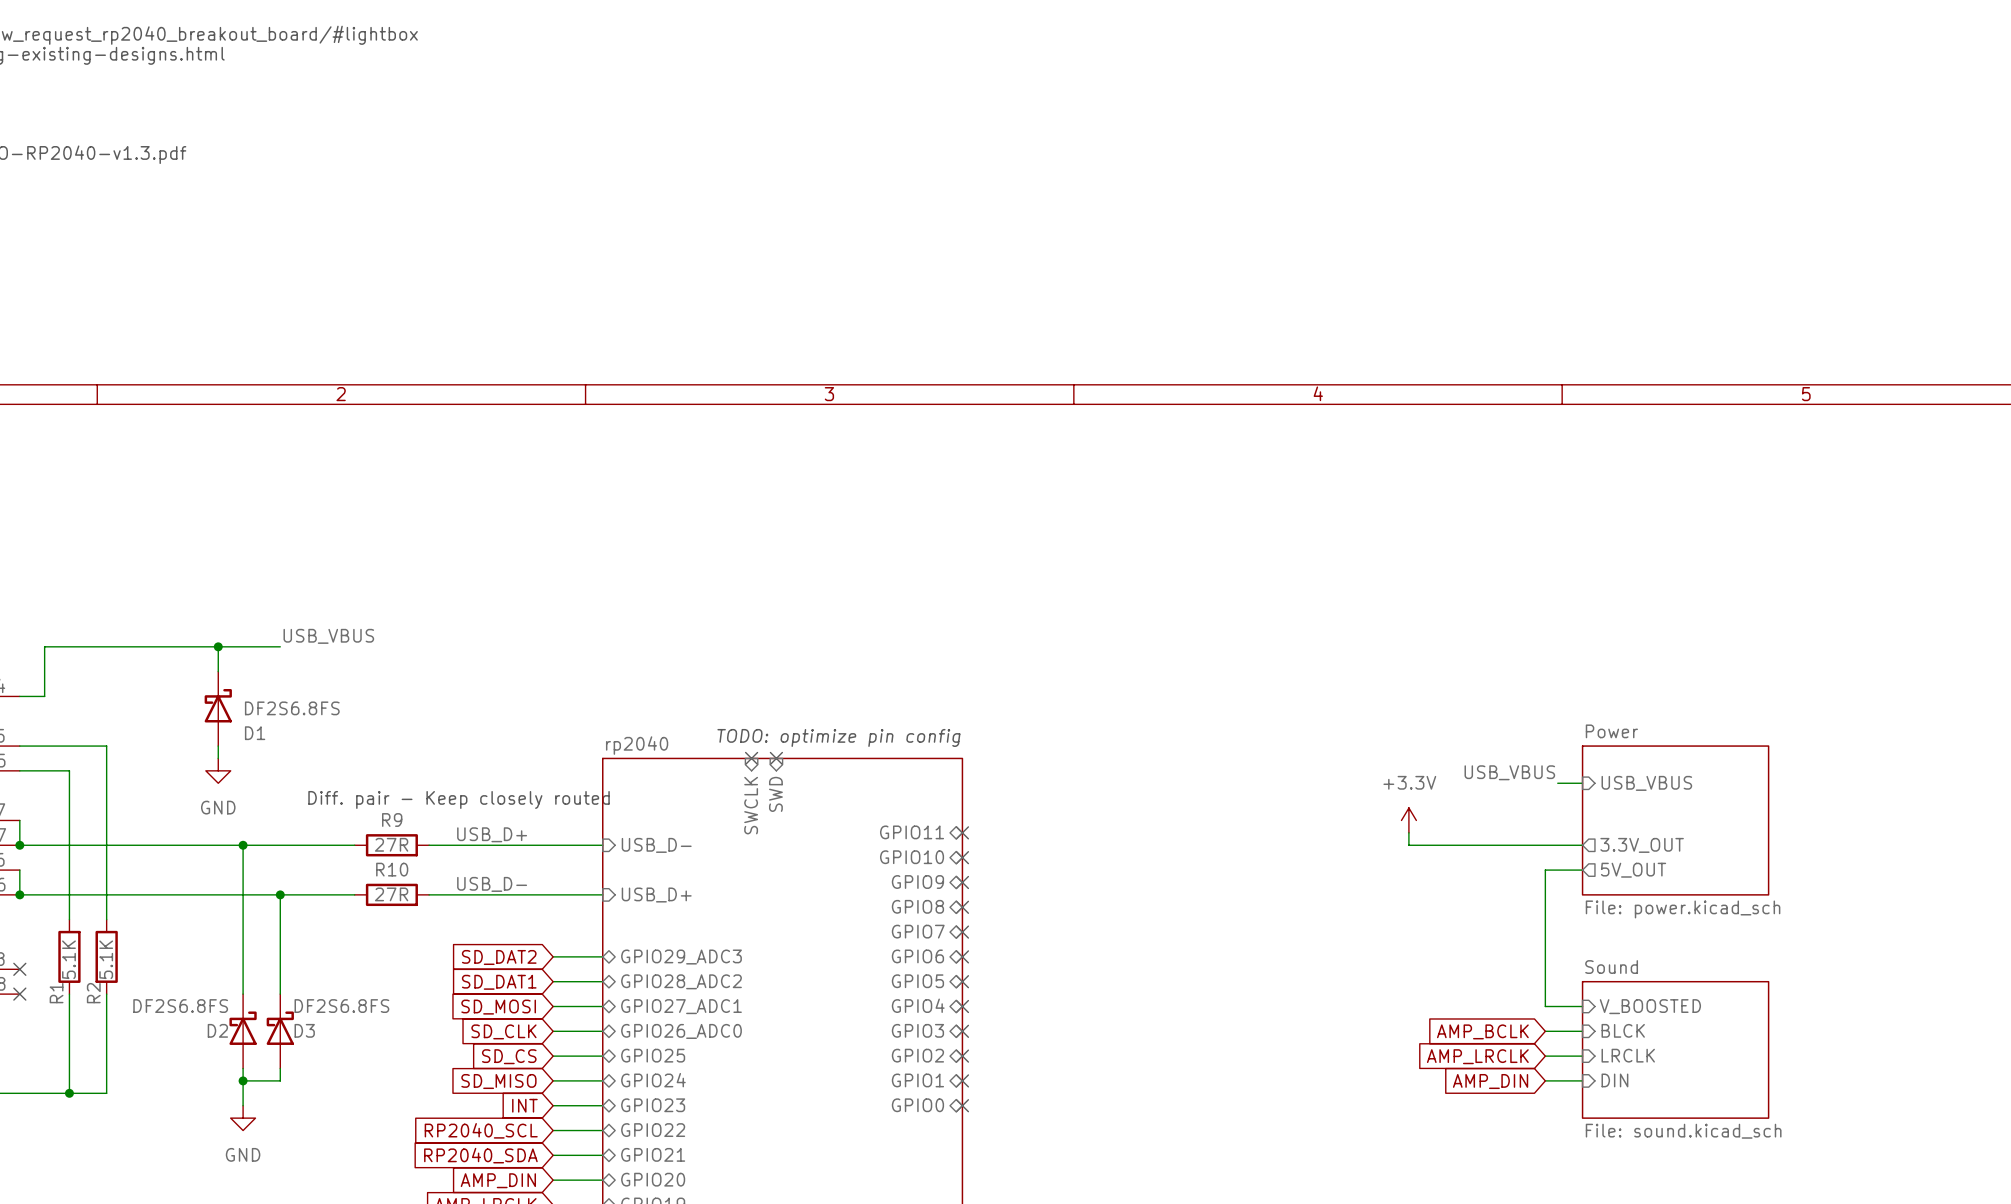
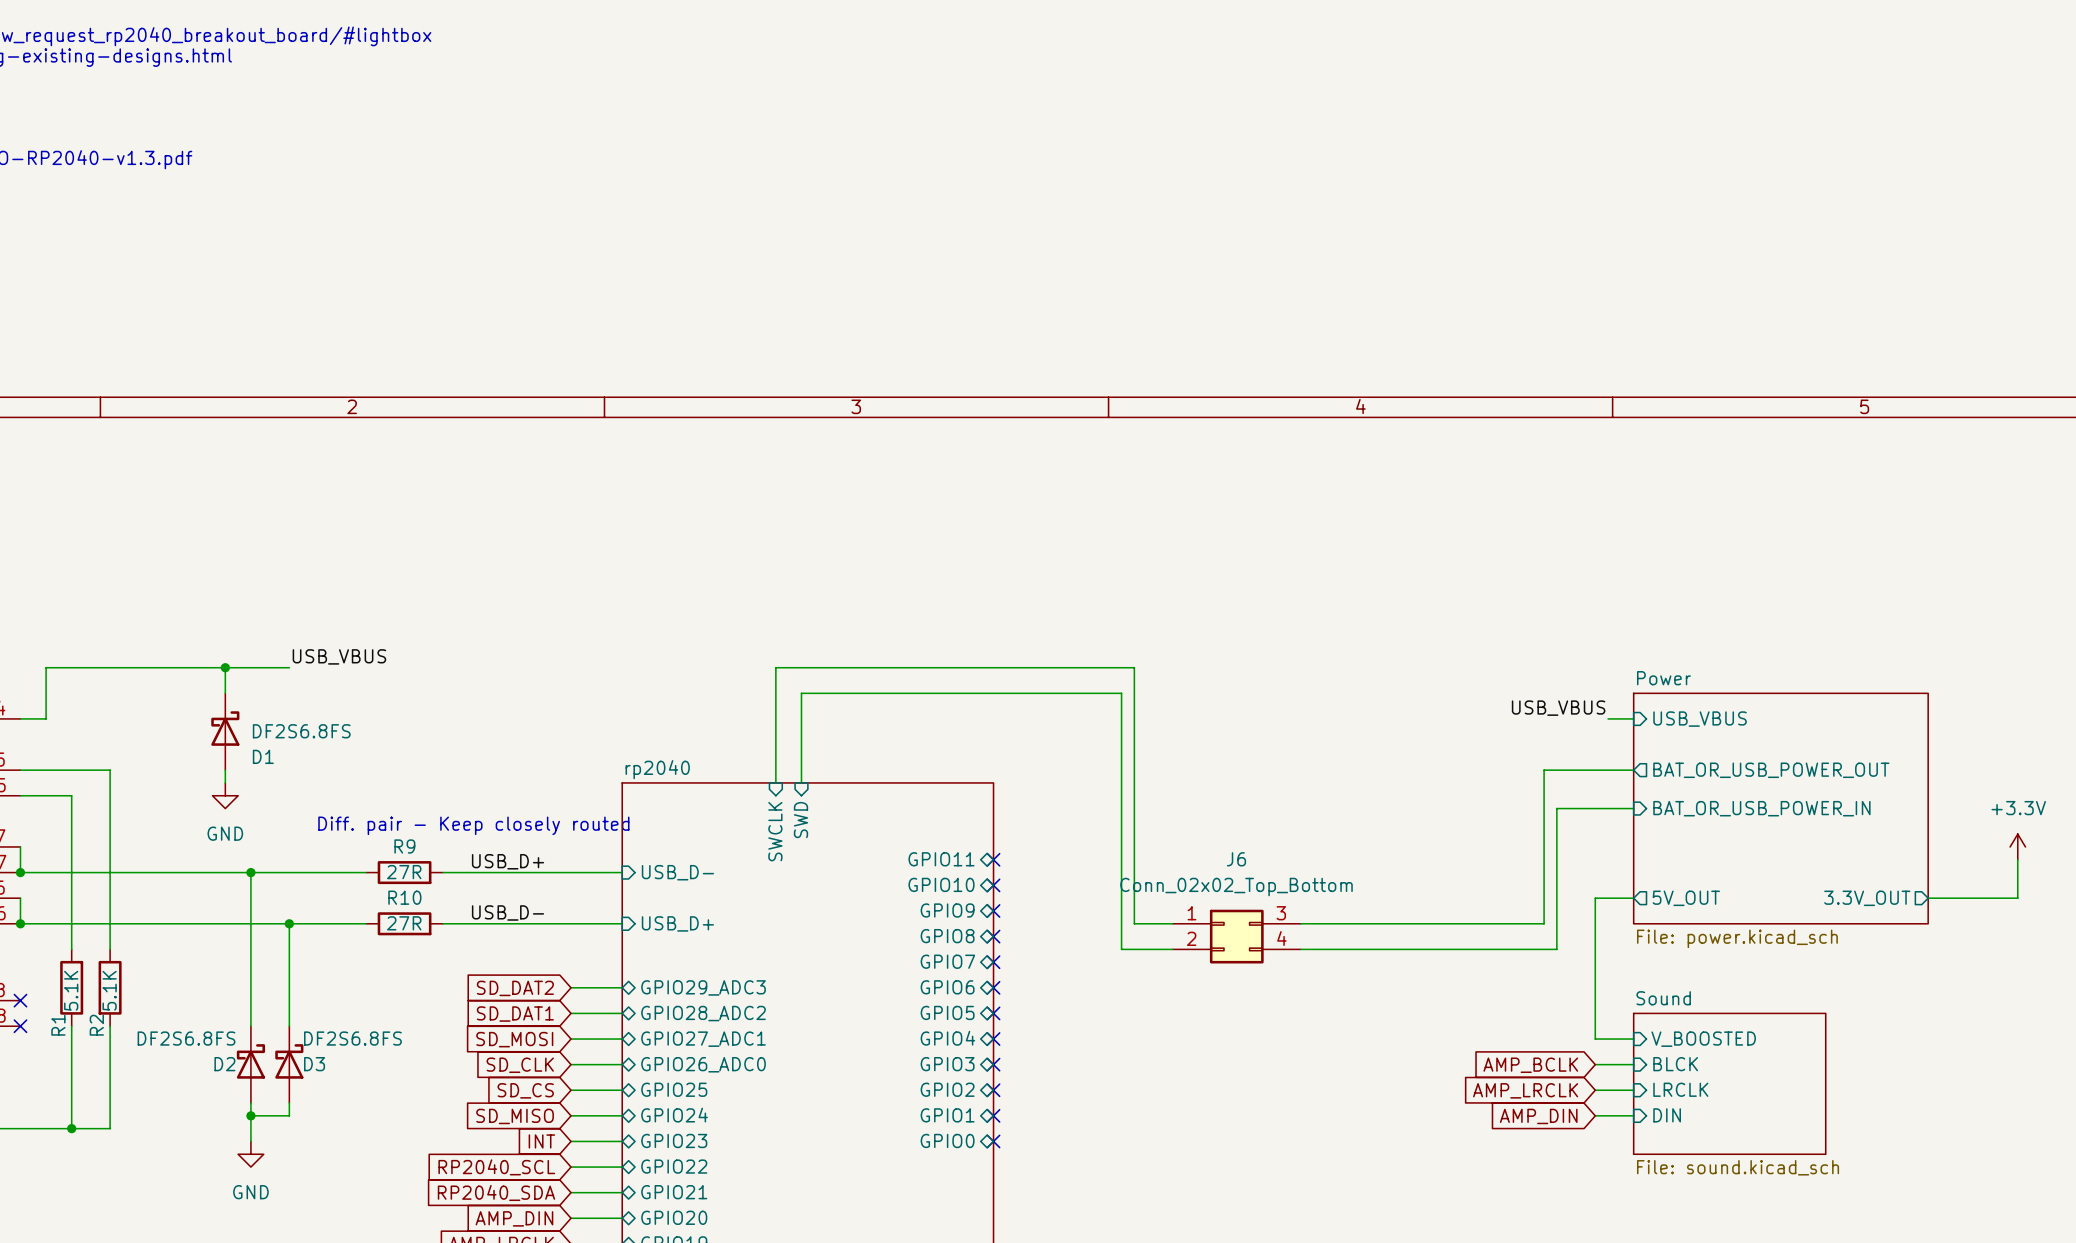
wire: none -> (1608, 718) (1633, 718)
sheet pin: none -> USB_VBUS (1700, 719)
text: TODO: optimize pin config (838, 737) -> none
wire: none -> (1633, 770) (1544, 770) (1544, 923) (1300, 923)
sheet pin: none -> BAT_OR_USB_POWER_OUT (1771, 770)
wire: none -> (775, 782) (775, 667) (1134, 667) (1134, 923) (1172, 923)
no-connect mark: (751, 758) -> none
wire: none -> (801, 782) (801, 693) (1121, 693) (1121, 949) (1172, 949)
no-connect mark: (776, 758) -> none
label position: USB_VBUS (1509, 772) -> USB_VBUS (1558, 708)
wire: none -> (1608, 808) (1556, 808) (1556, 949) (1300, 949)
sheet pin: USB_VBUS (1646, 783) -> BAT_OR_USB_POWER_IN (1761, 808)
sheet Power: none -> File: power.kicad_sch (1780, 808)
power symbol: +3.3V (1408, 820) -> none
sheet Power: File: power.kicad_sch (1675, 820) -> none
power symbol: none -> +3.3V (2017, 846)
wire: (1408, 832) (1408, 845) (1582, 845) -> none
wire: none -> (2017, 859) (2017, 898) (1928, 898)
sheet pin: 3.3V_OUT (1642, 845) -> none
sheet pin: none -> 3.3V_OUT (1867, 898)
J6: none -> Conn_02x02_Top_Bottom (1236, 936)

